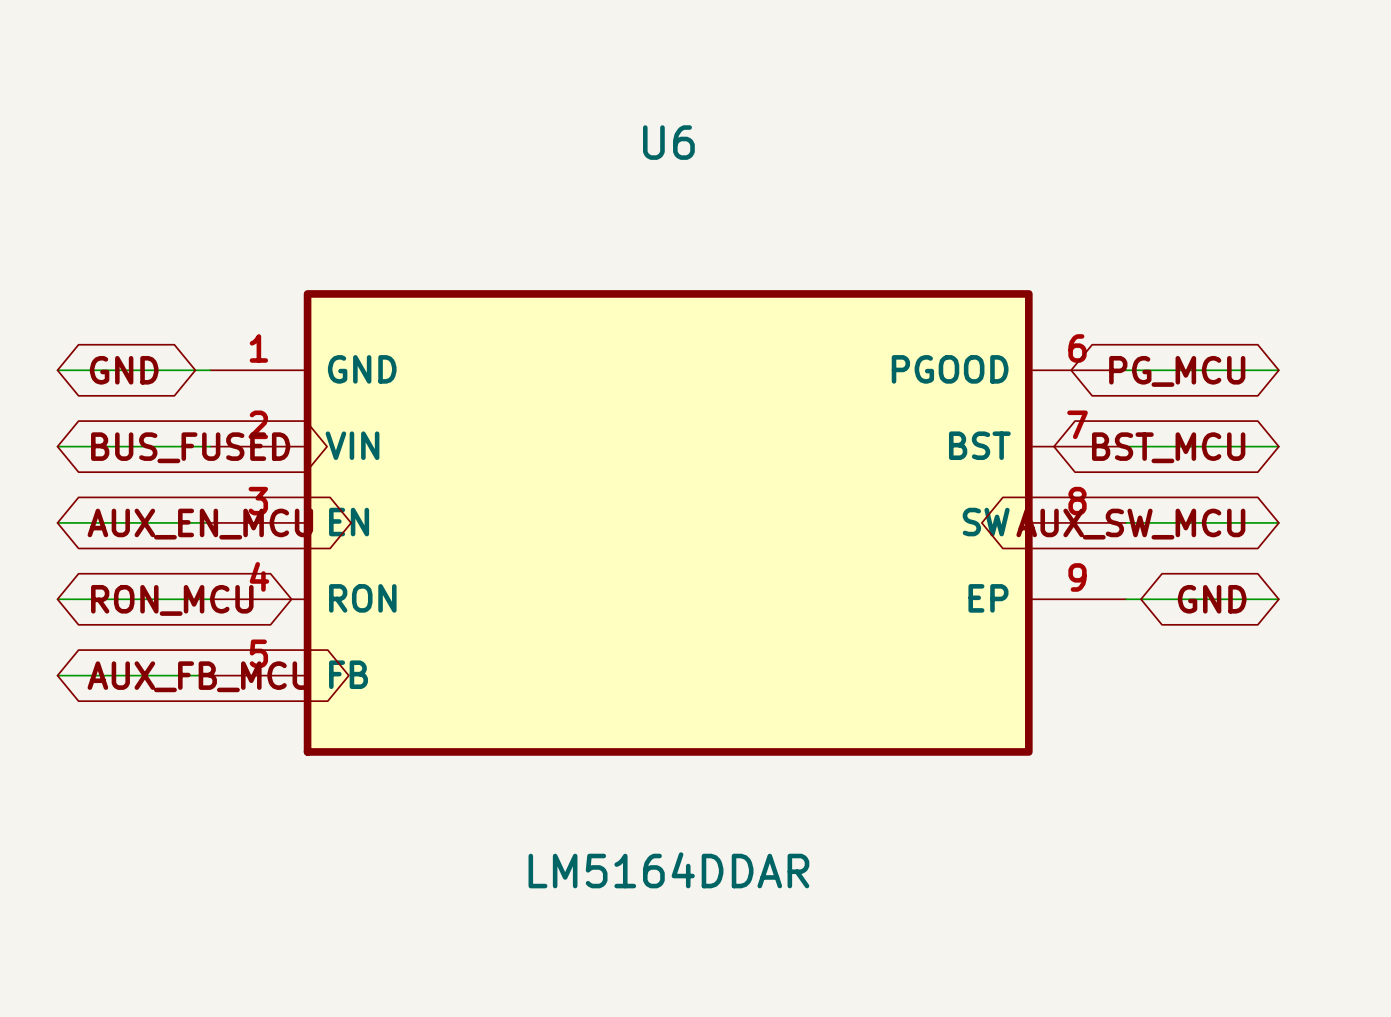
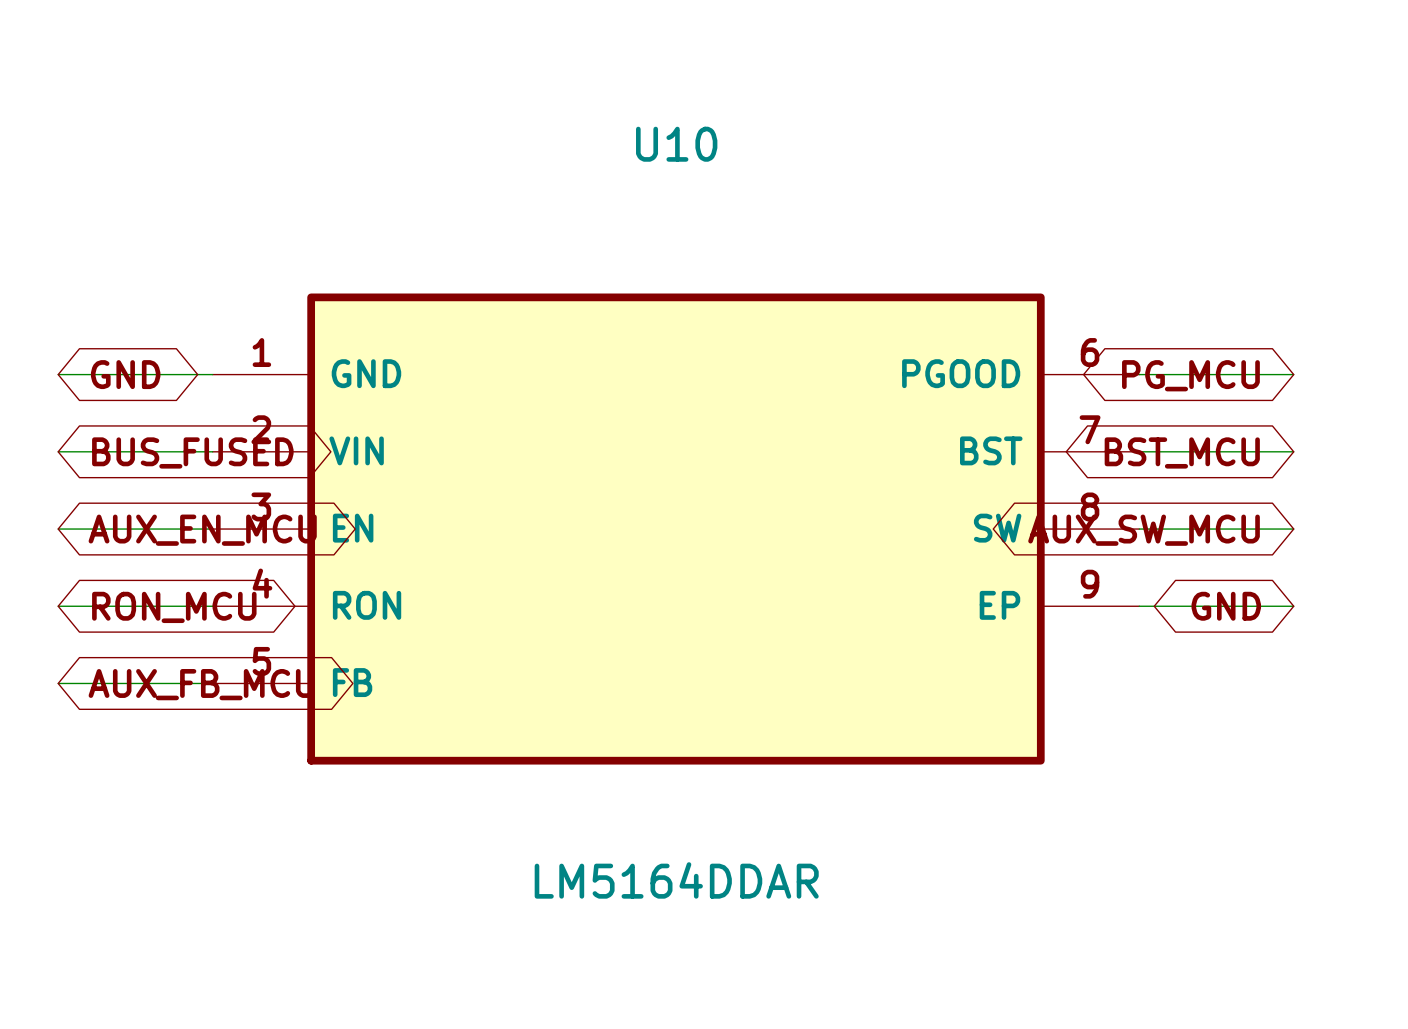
U6 name: U6 (668, 142) -> U10 (676, 144)

